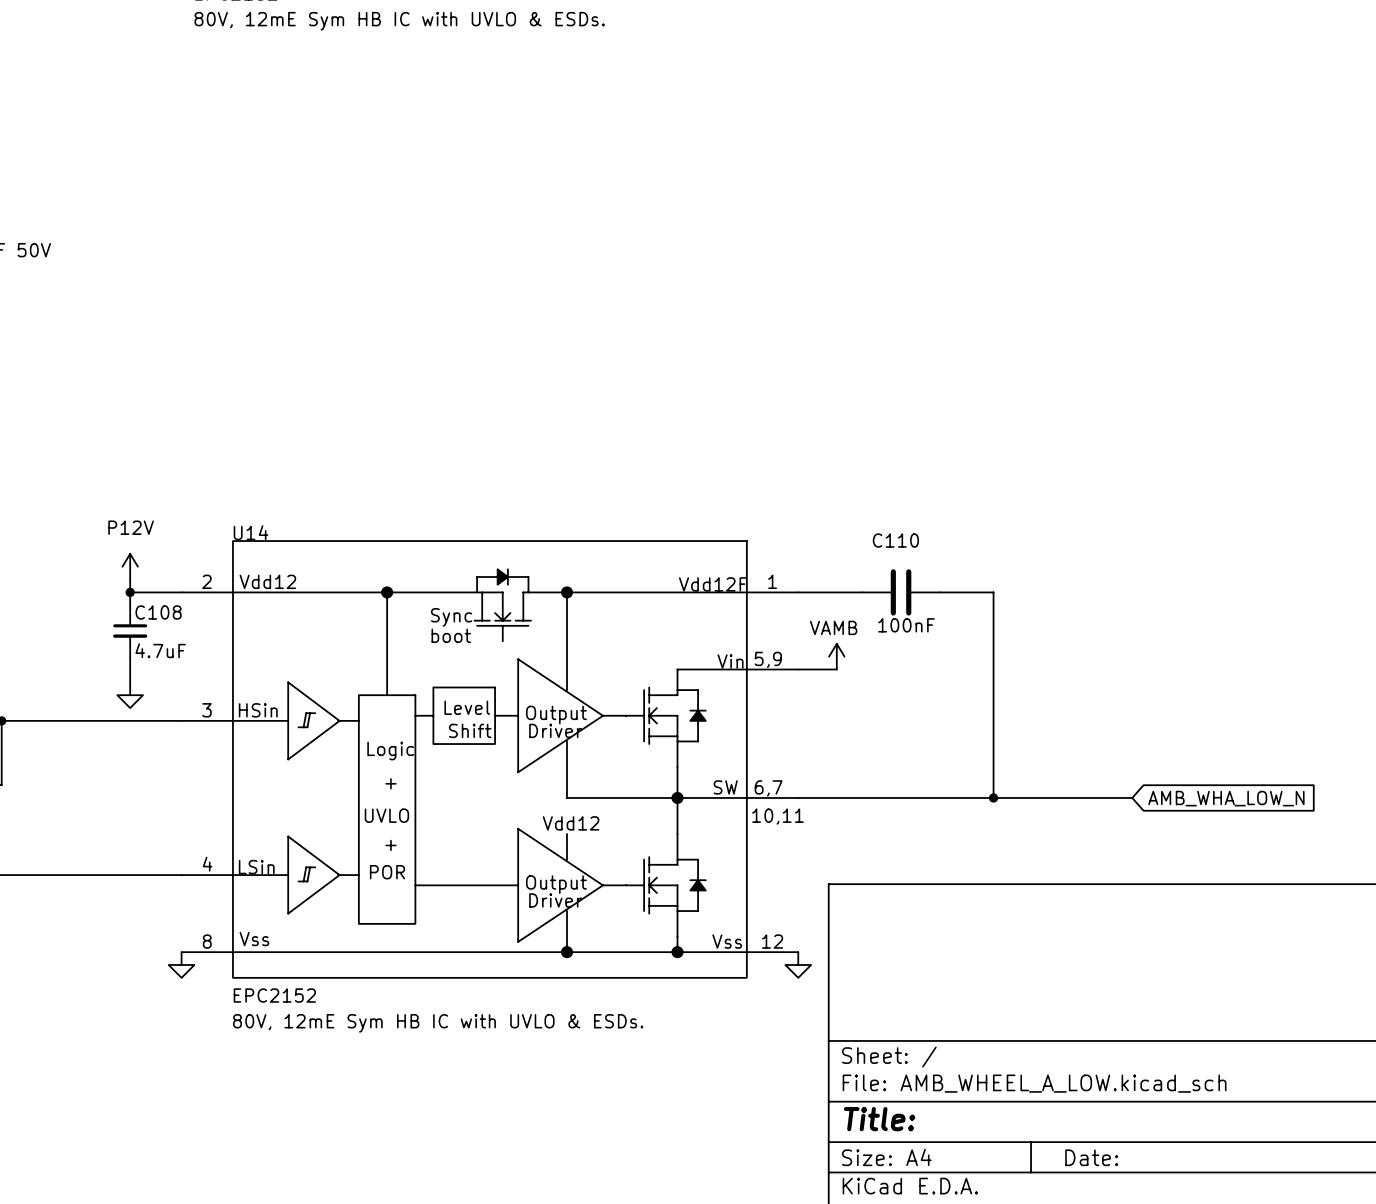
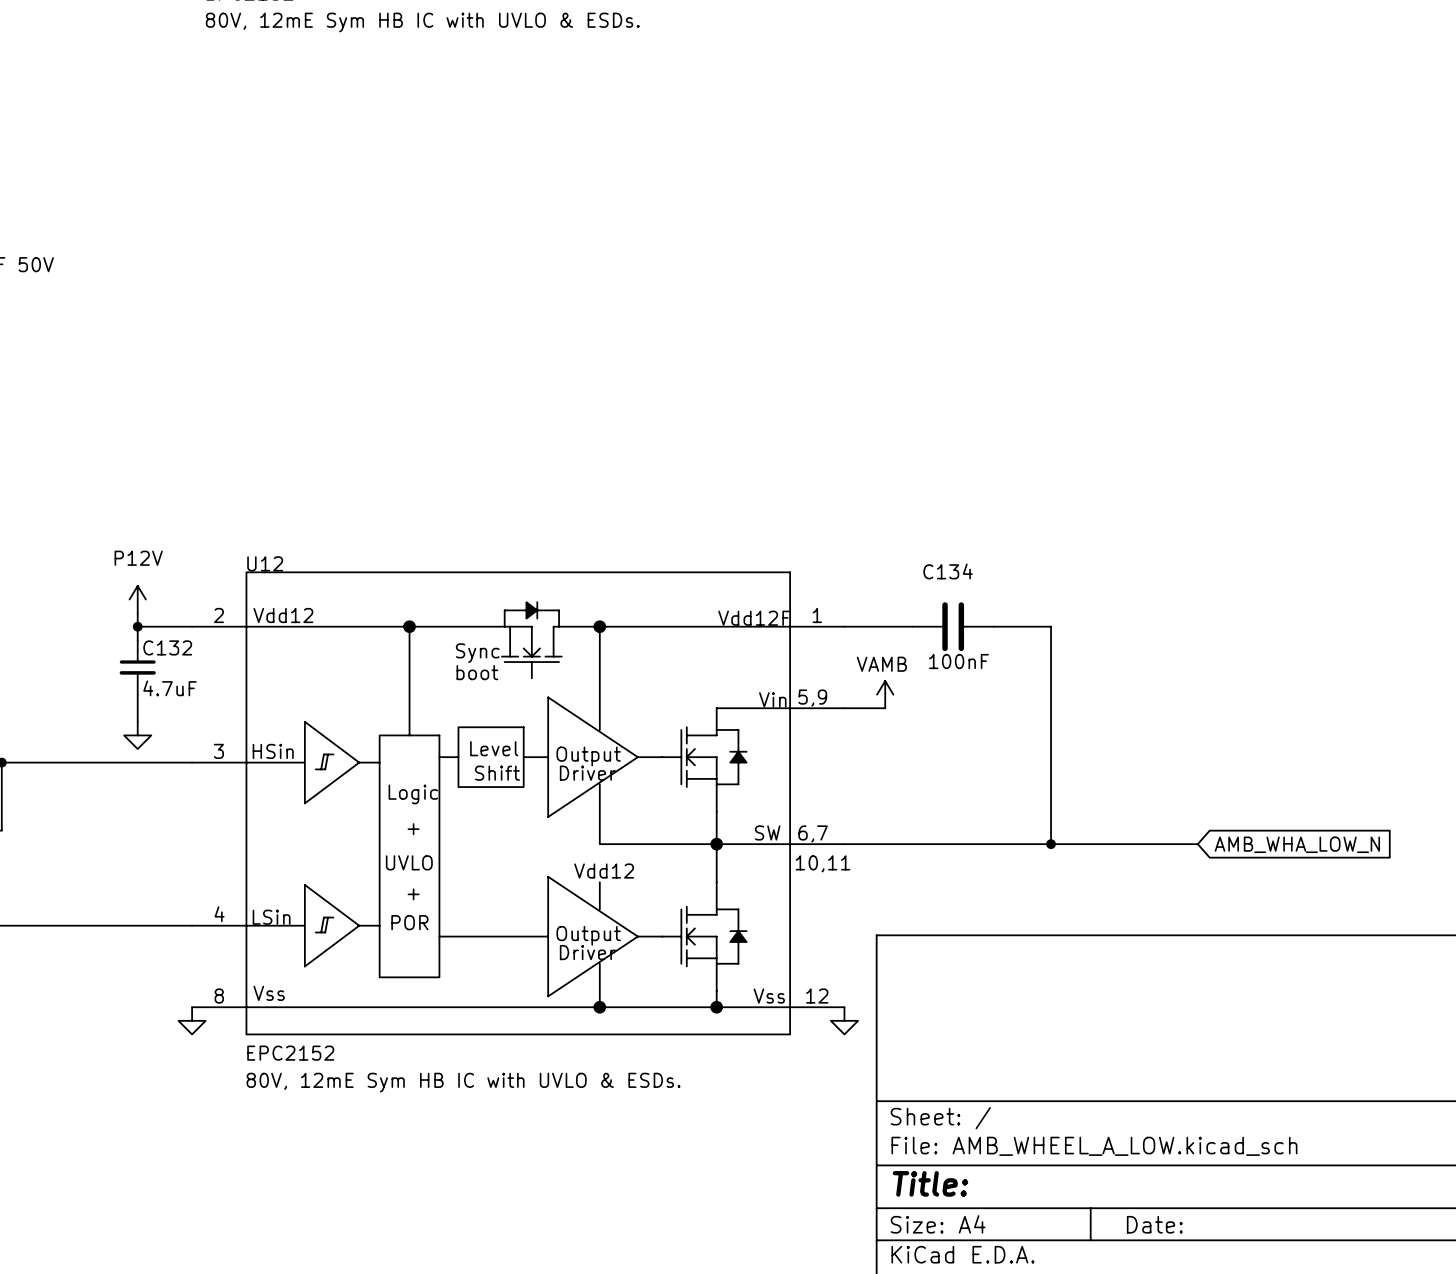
U14 name: U14 (250, 532) -> U12 (265, 563)
C110 name: C110 (895, 540) -> C134 (948, 571)
C108 name: C108 (158, 612) -> C132 (167, 647)

